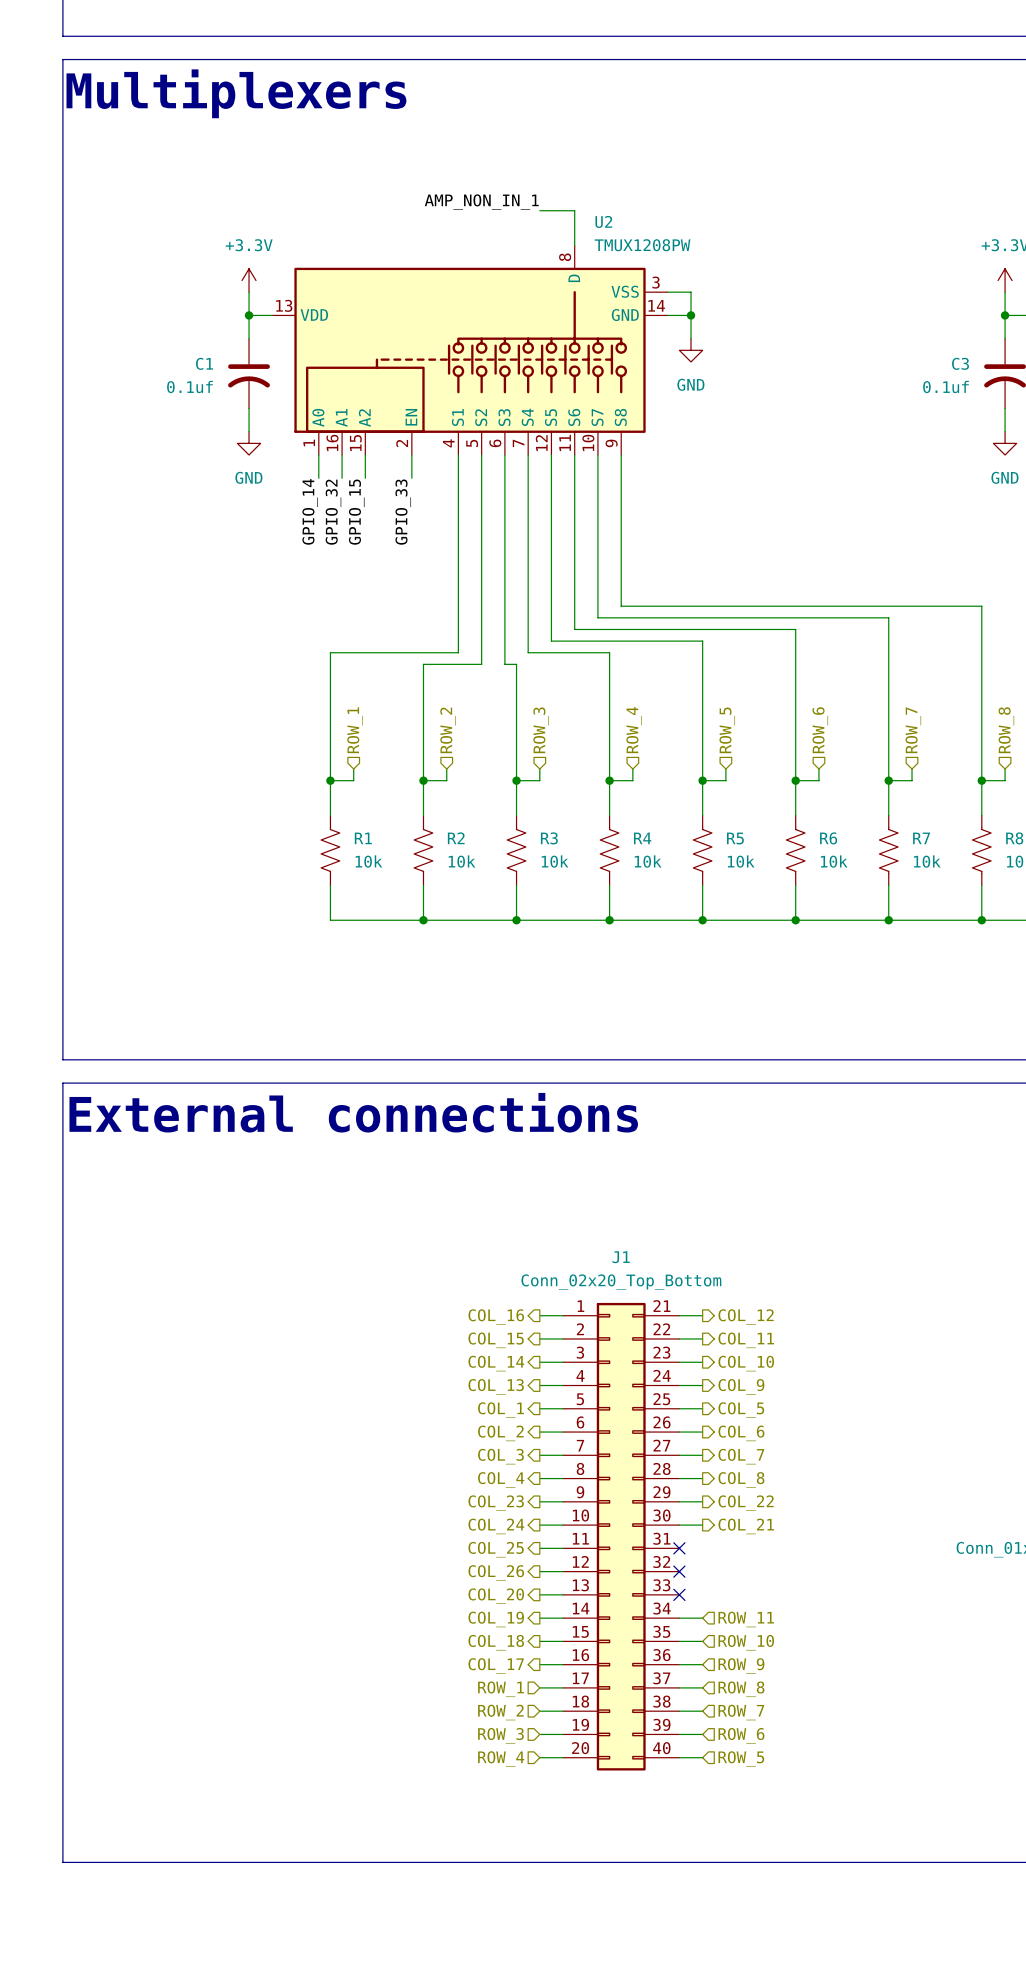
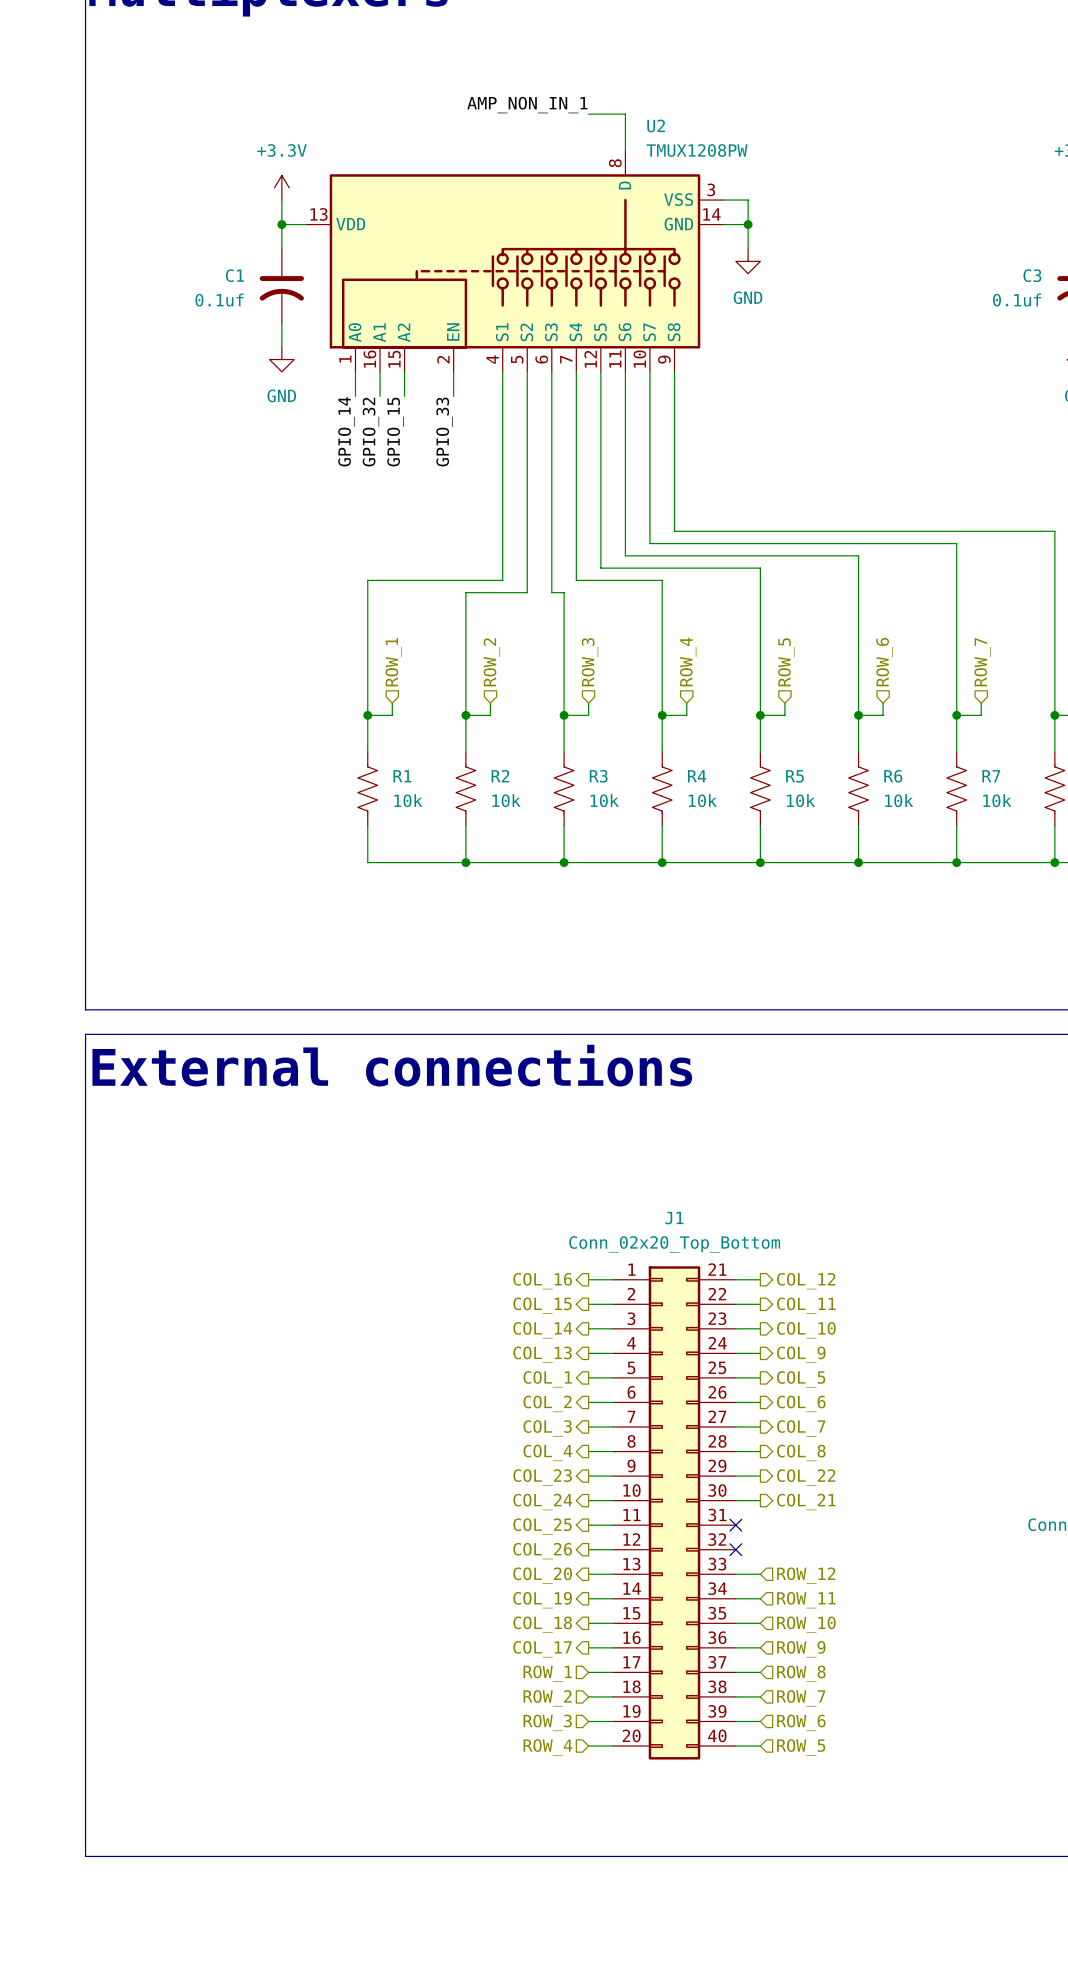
wire: none -> (735, 1574) (760, 1574)
no-connect mark: (679, 1594) -> none
hierarchical label: none -> ROW_12 (806, 1575)

